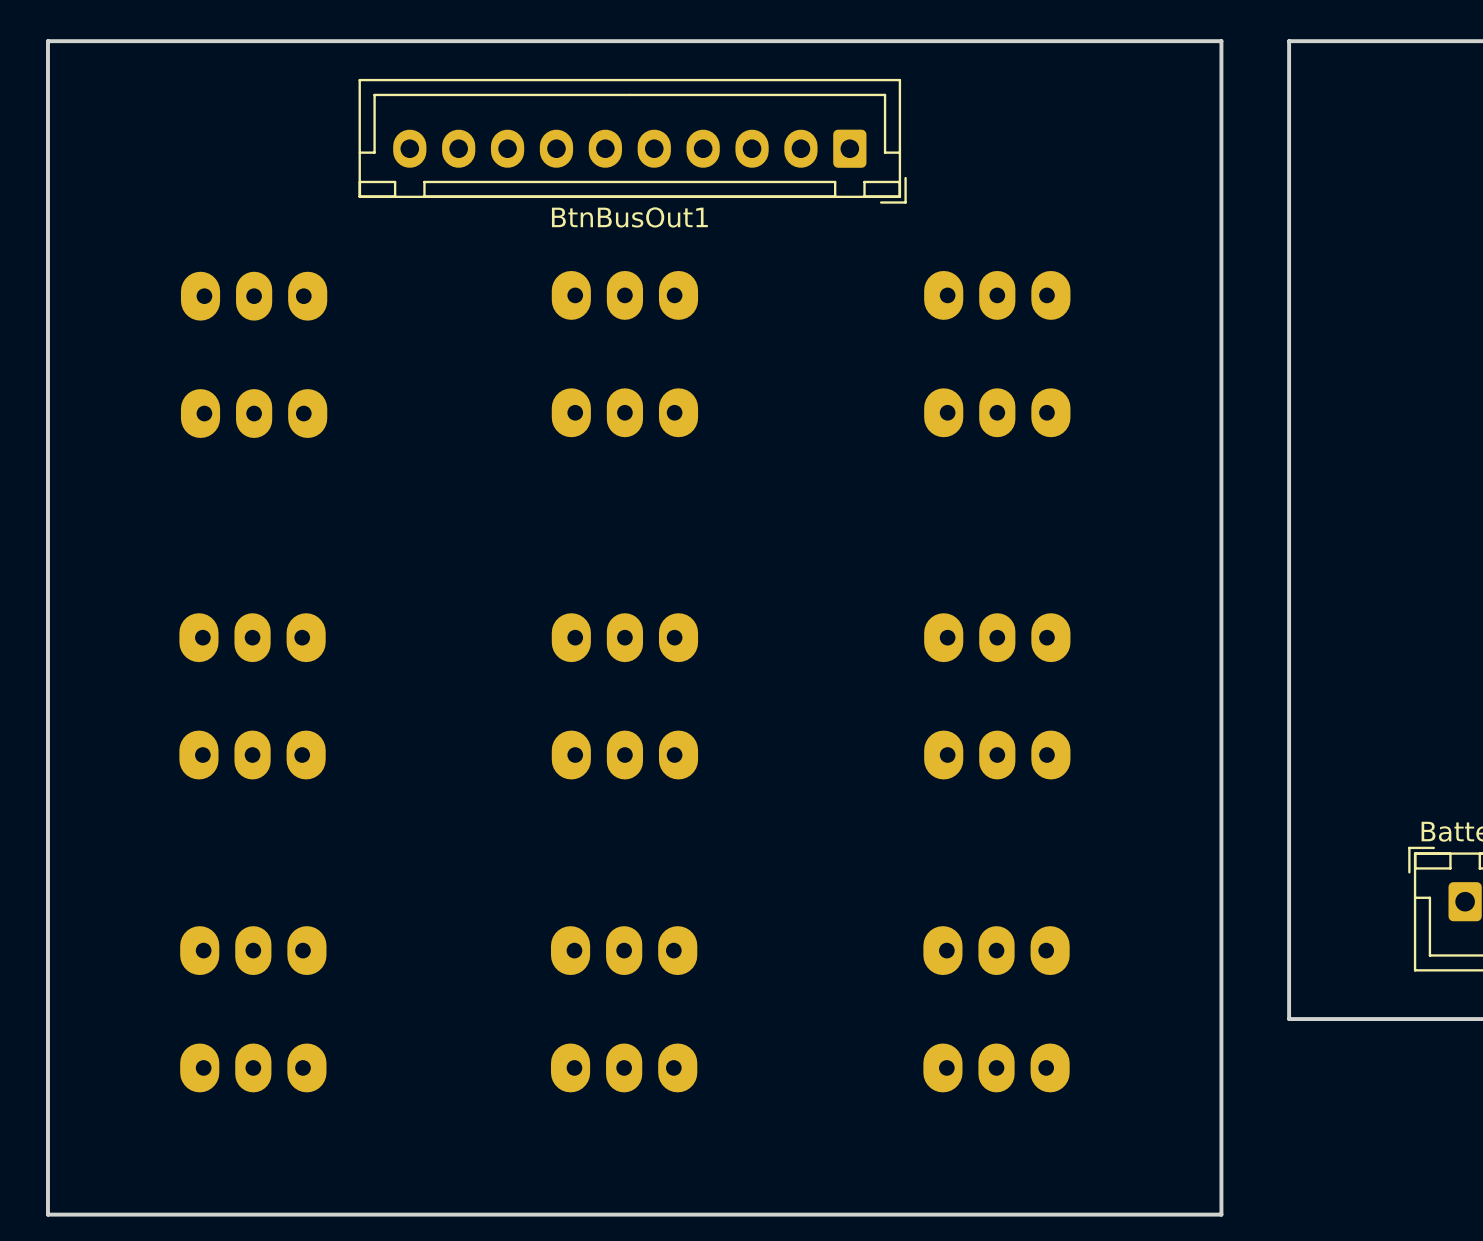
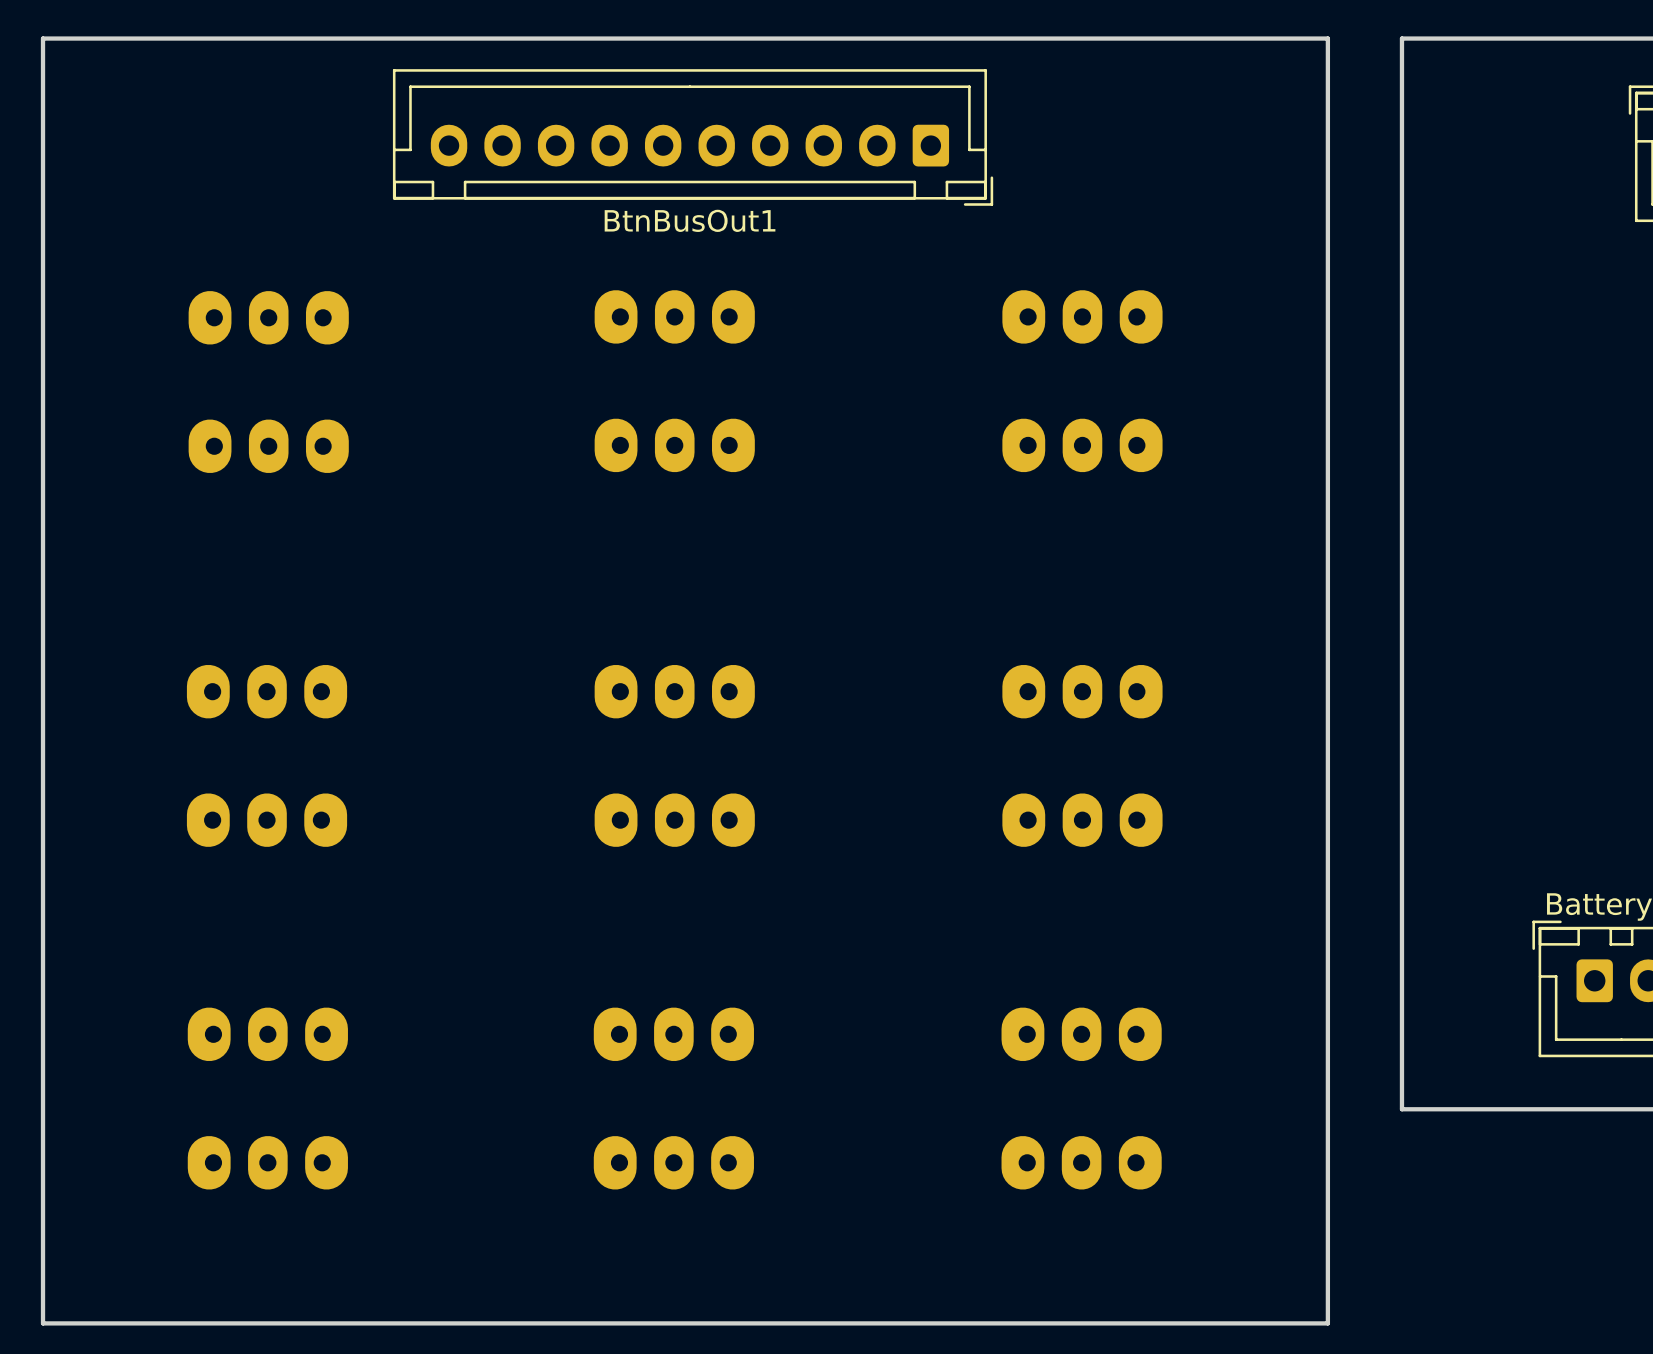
BtnBusOut1 position: (632, 141) -> (693, 137)

